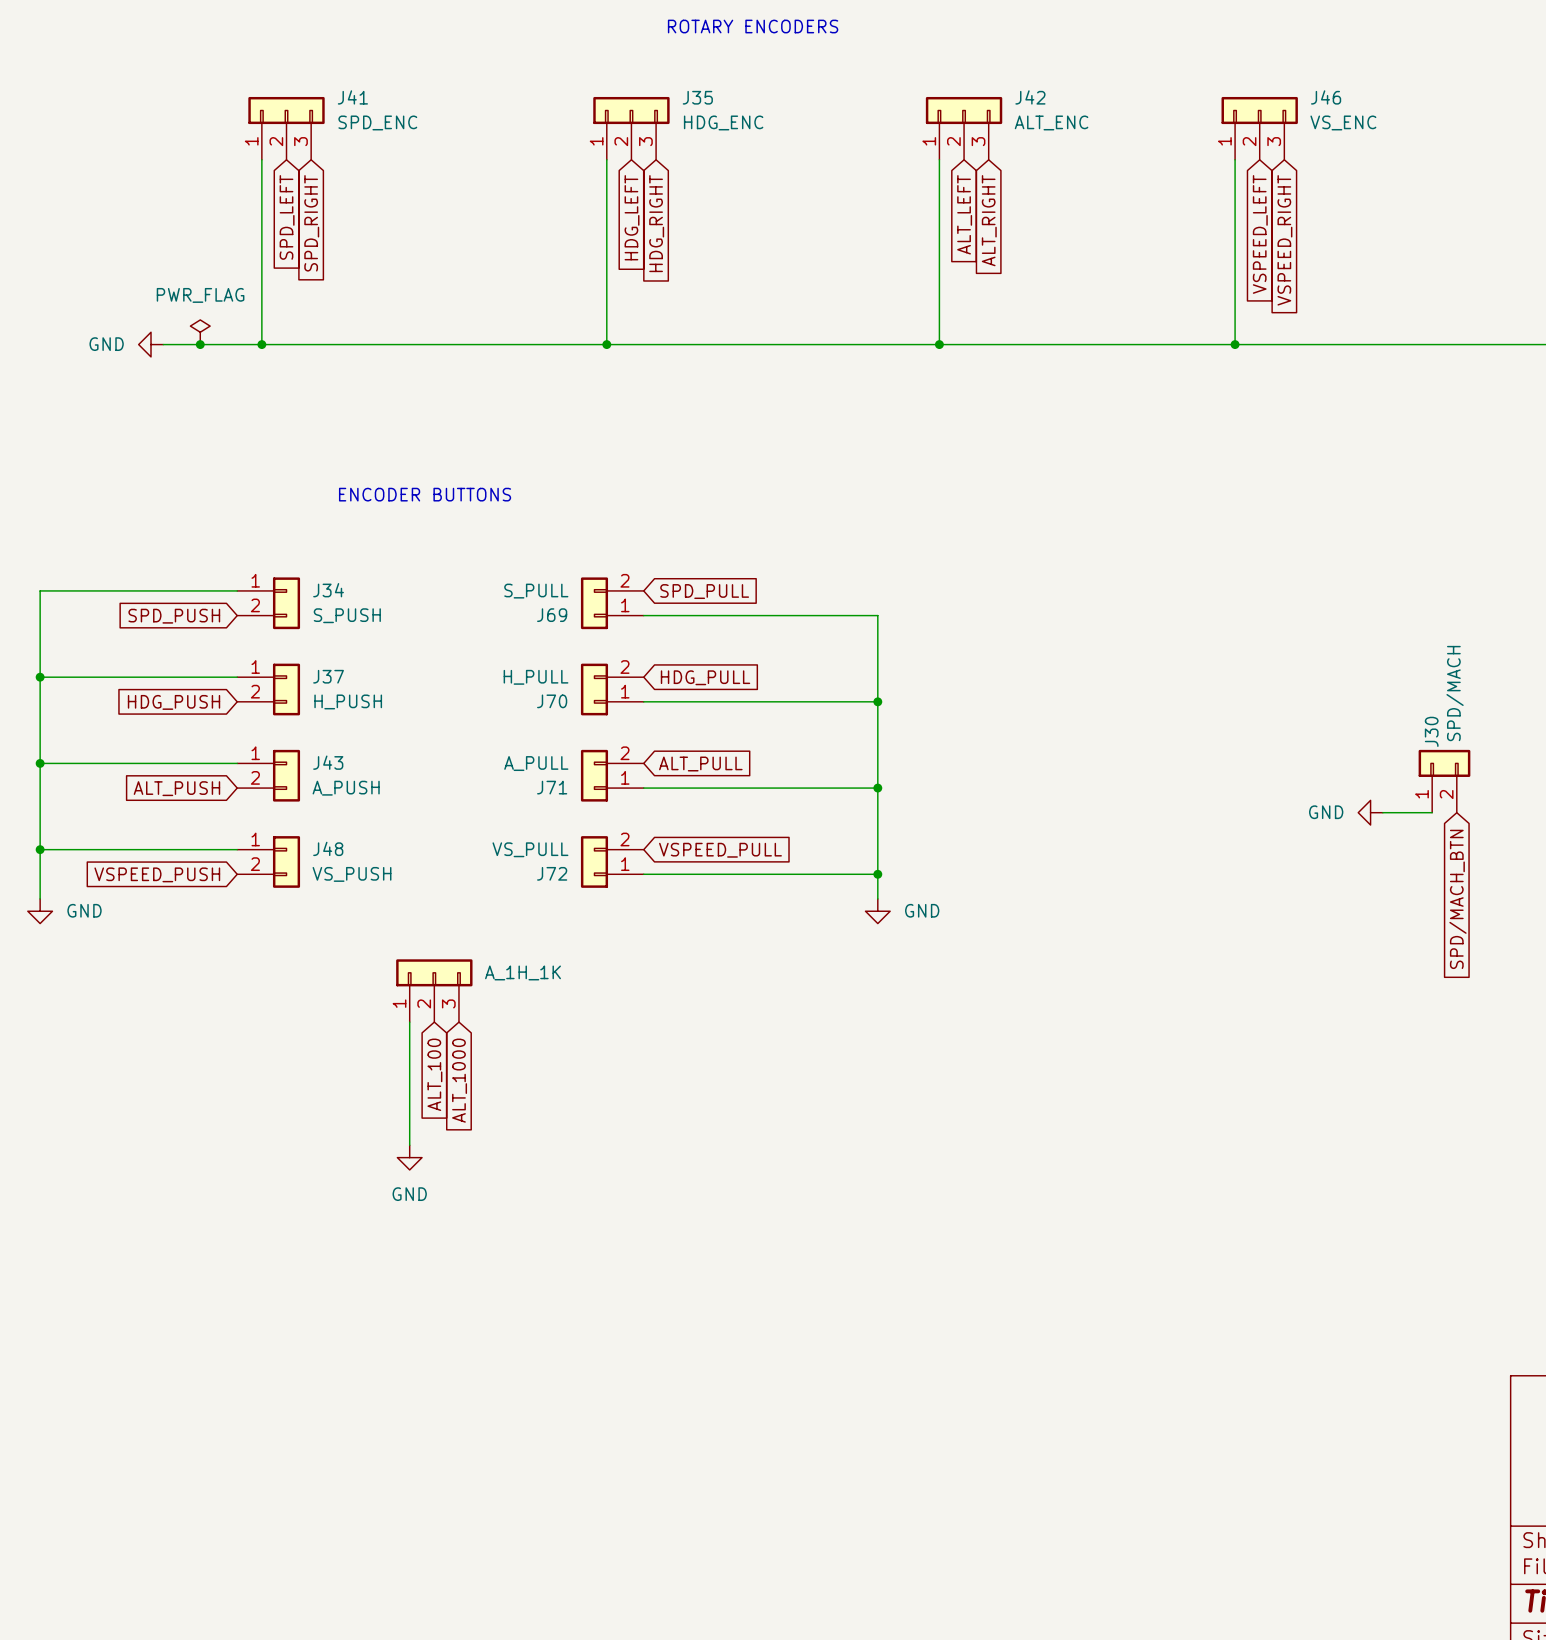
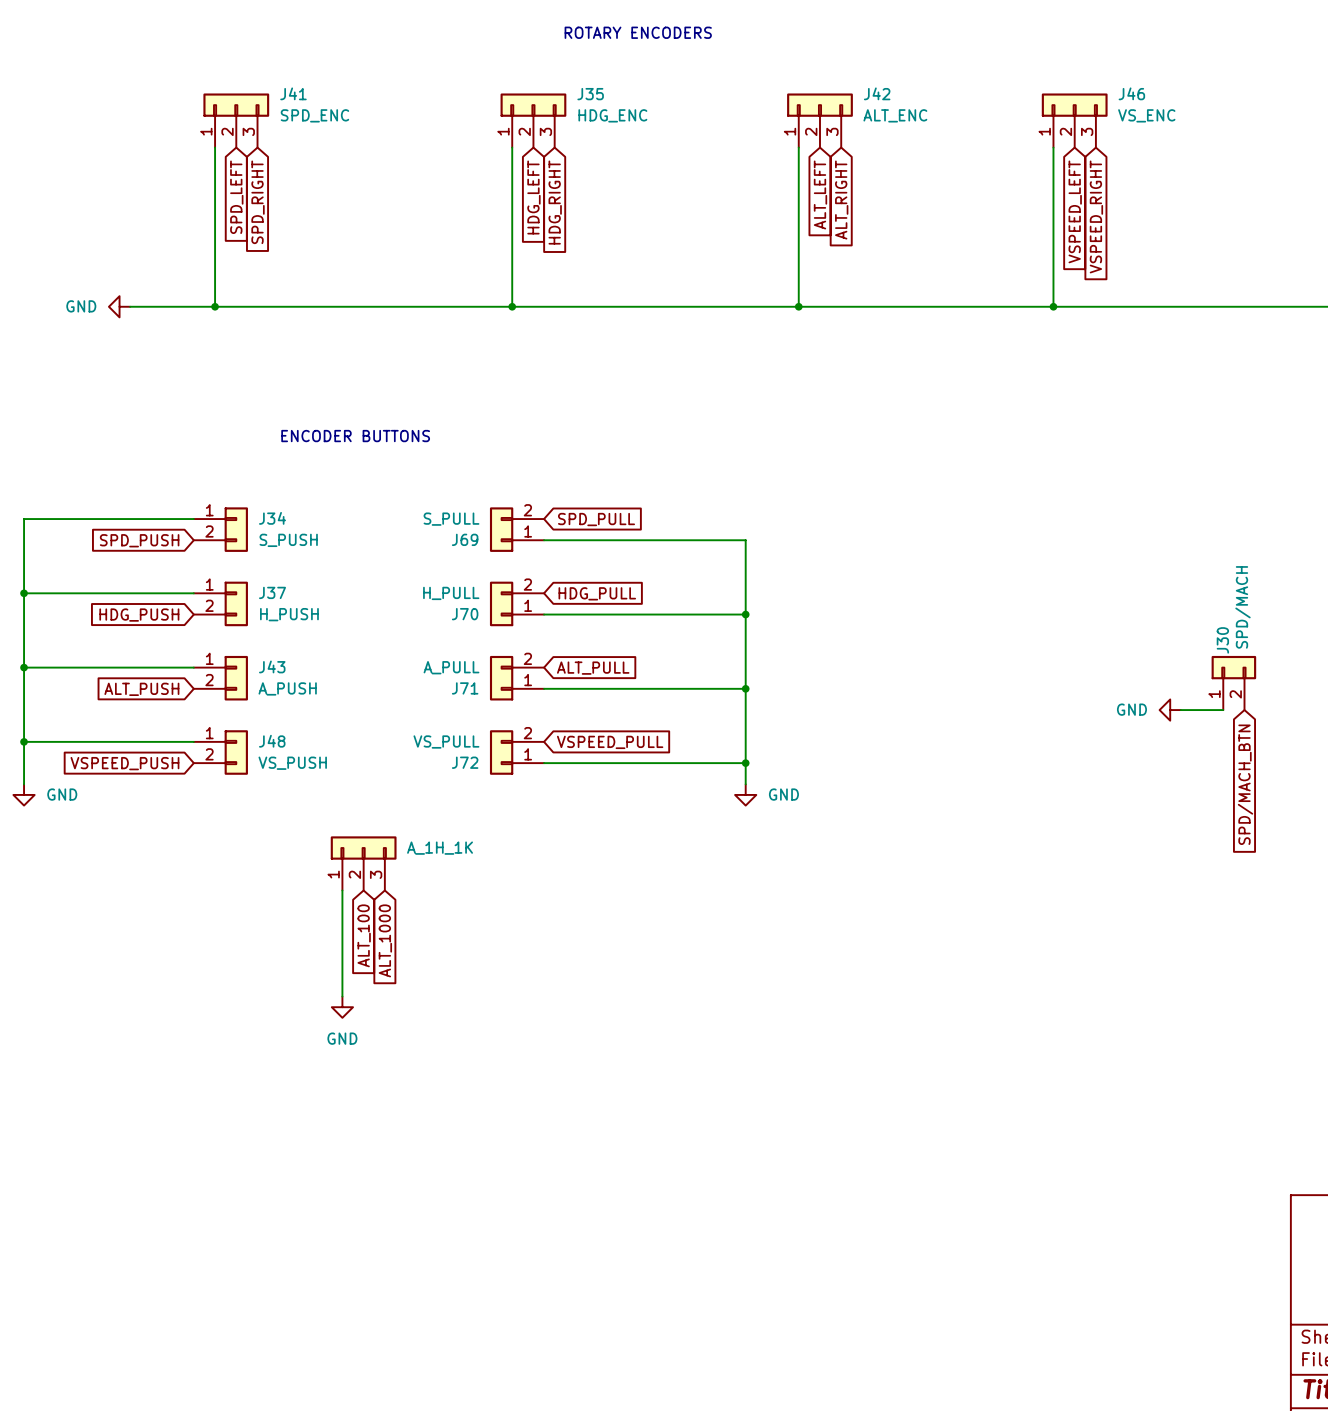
power symbol: PWR_FLAG (200, 332) -> none
junction: (200, 344) -> none

